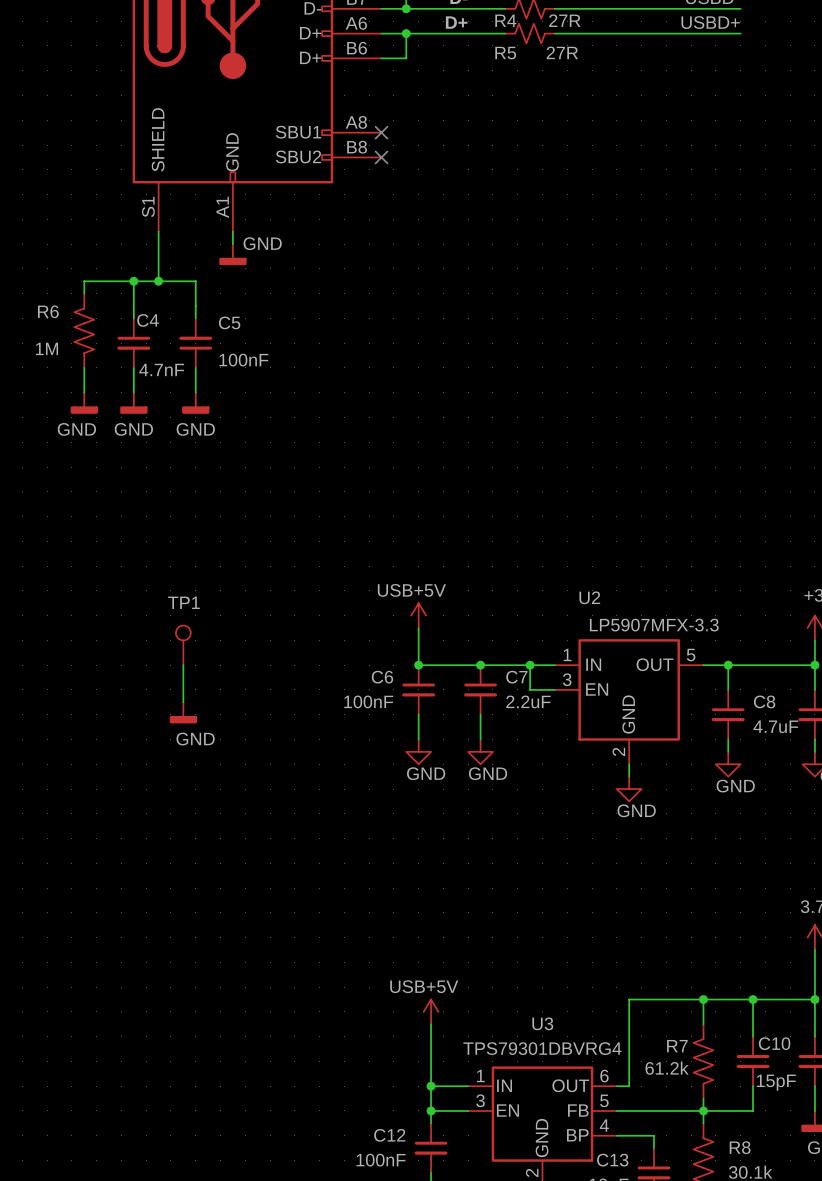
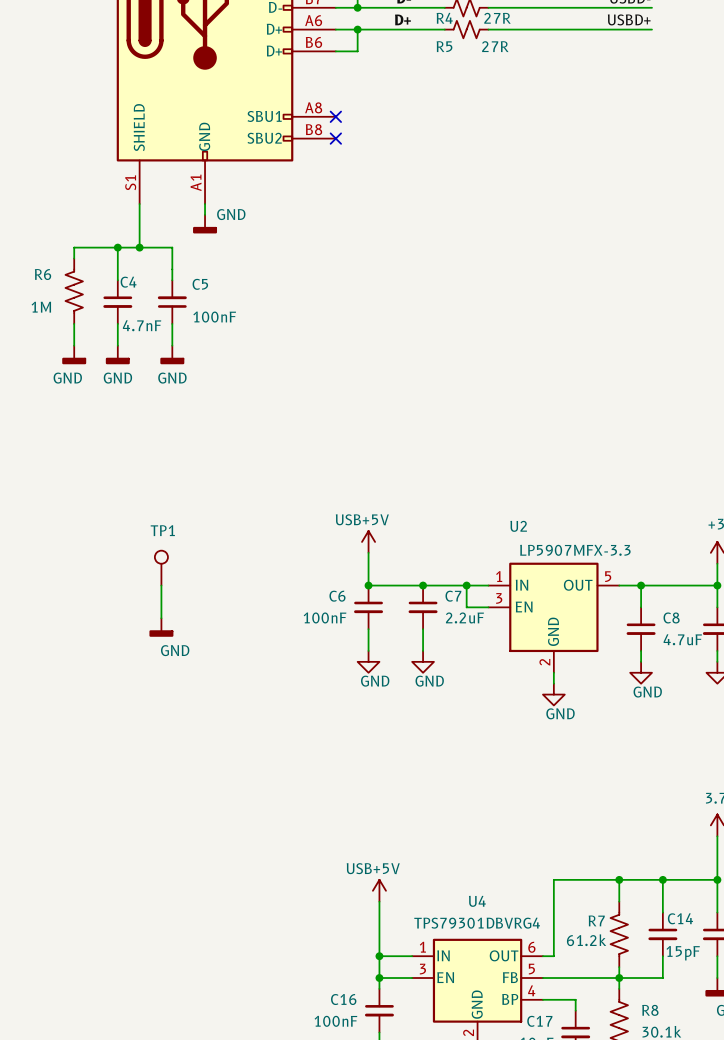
U3 name: U3 (542, 1023) -> U4 (477, 901)
C10 name: C10 (774, 1043) -> C14 (680, 918)
C12 name: C12 (389, 1135) -> C16 (343, 999)
C13 name: C13 (612, 1160) -> C17 (539, 1021)

